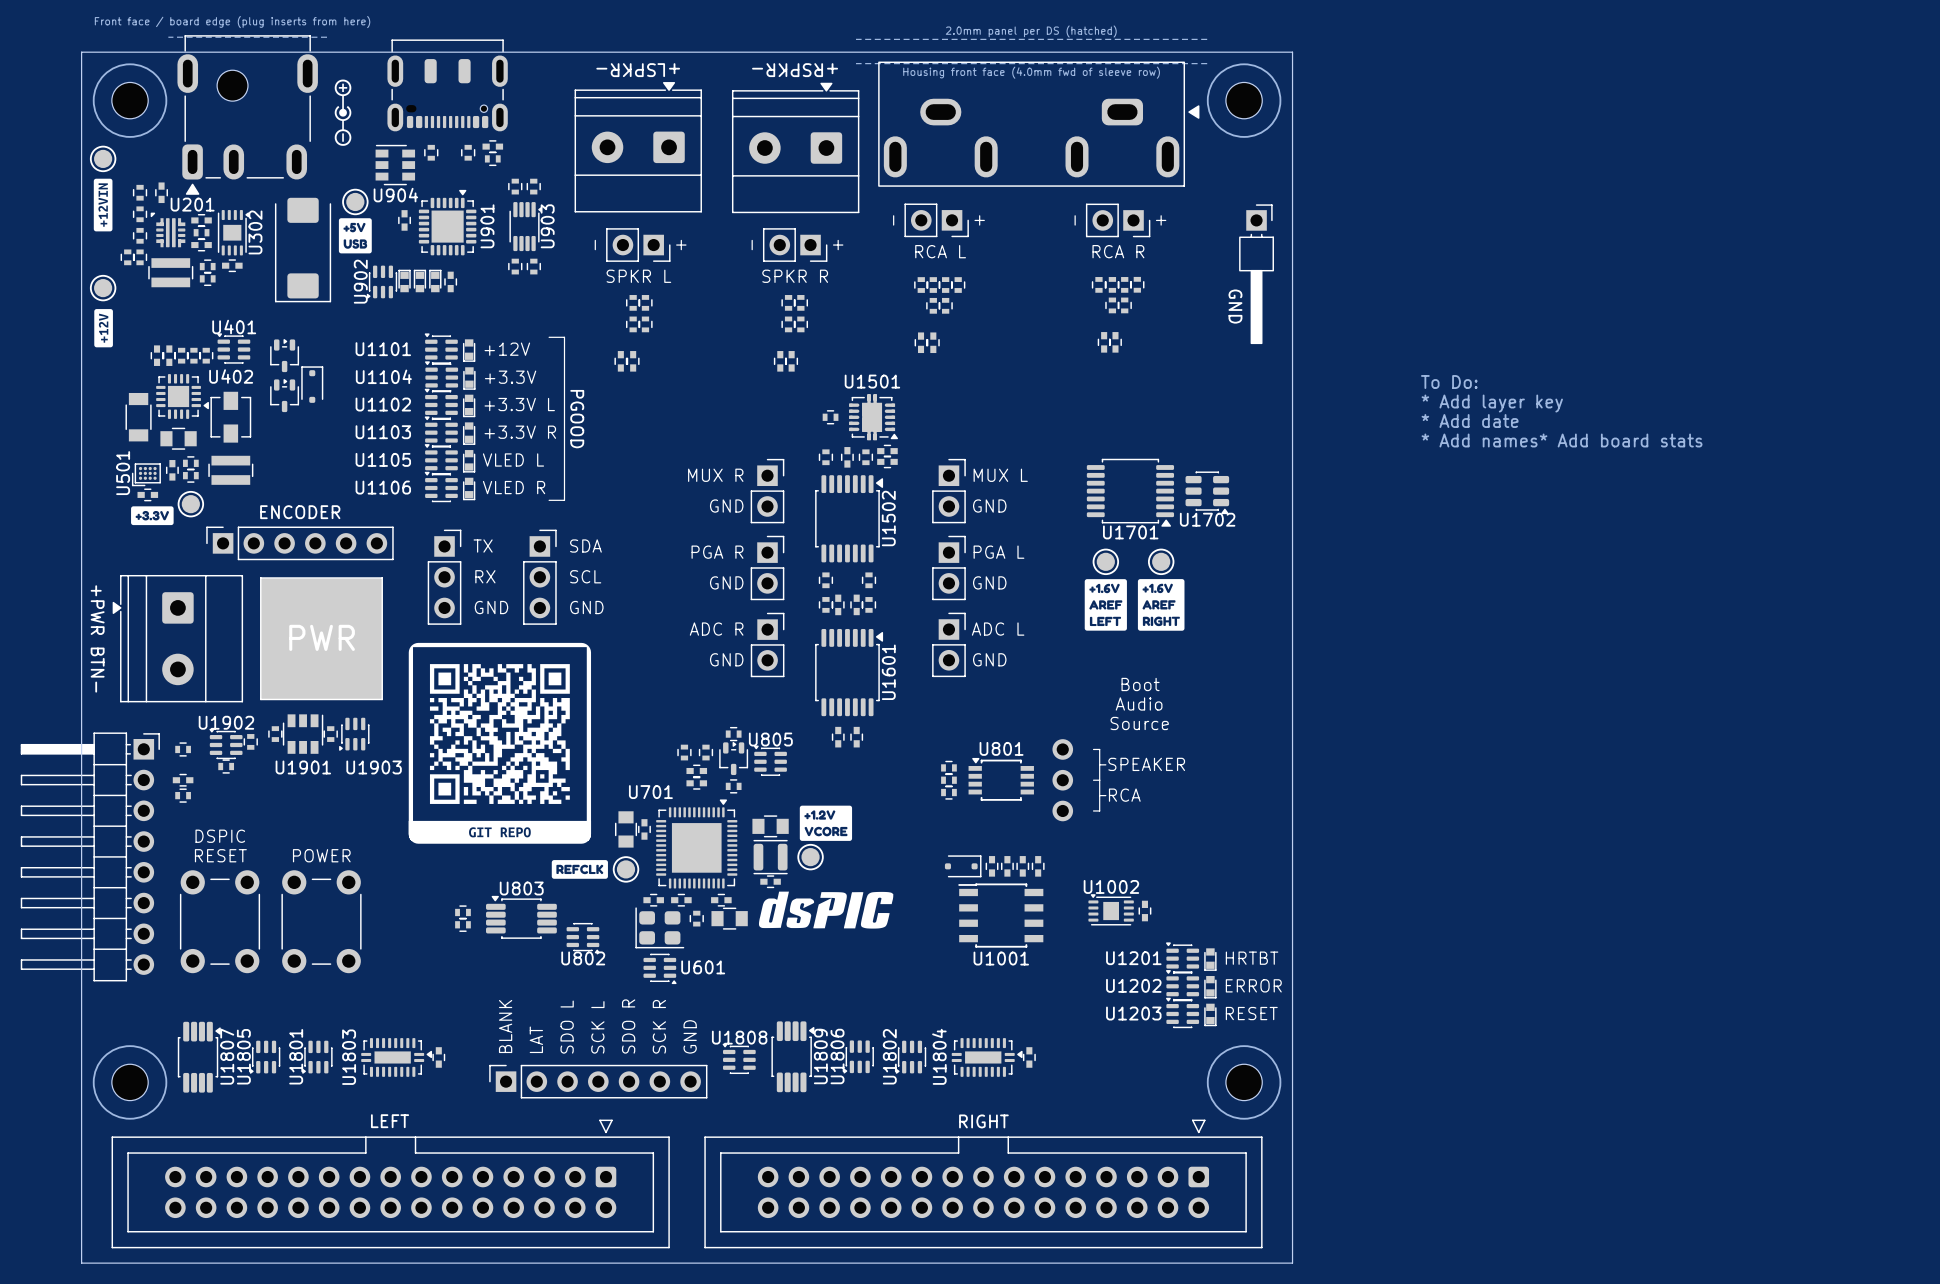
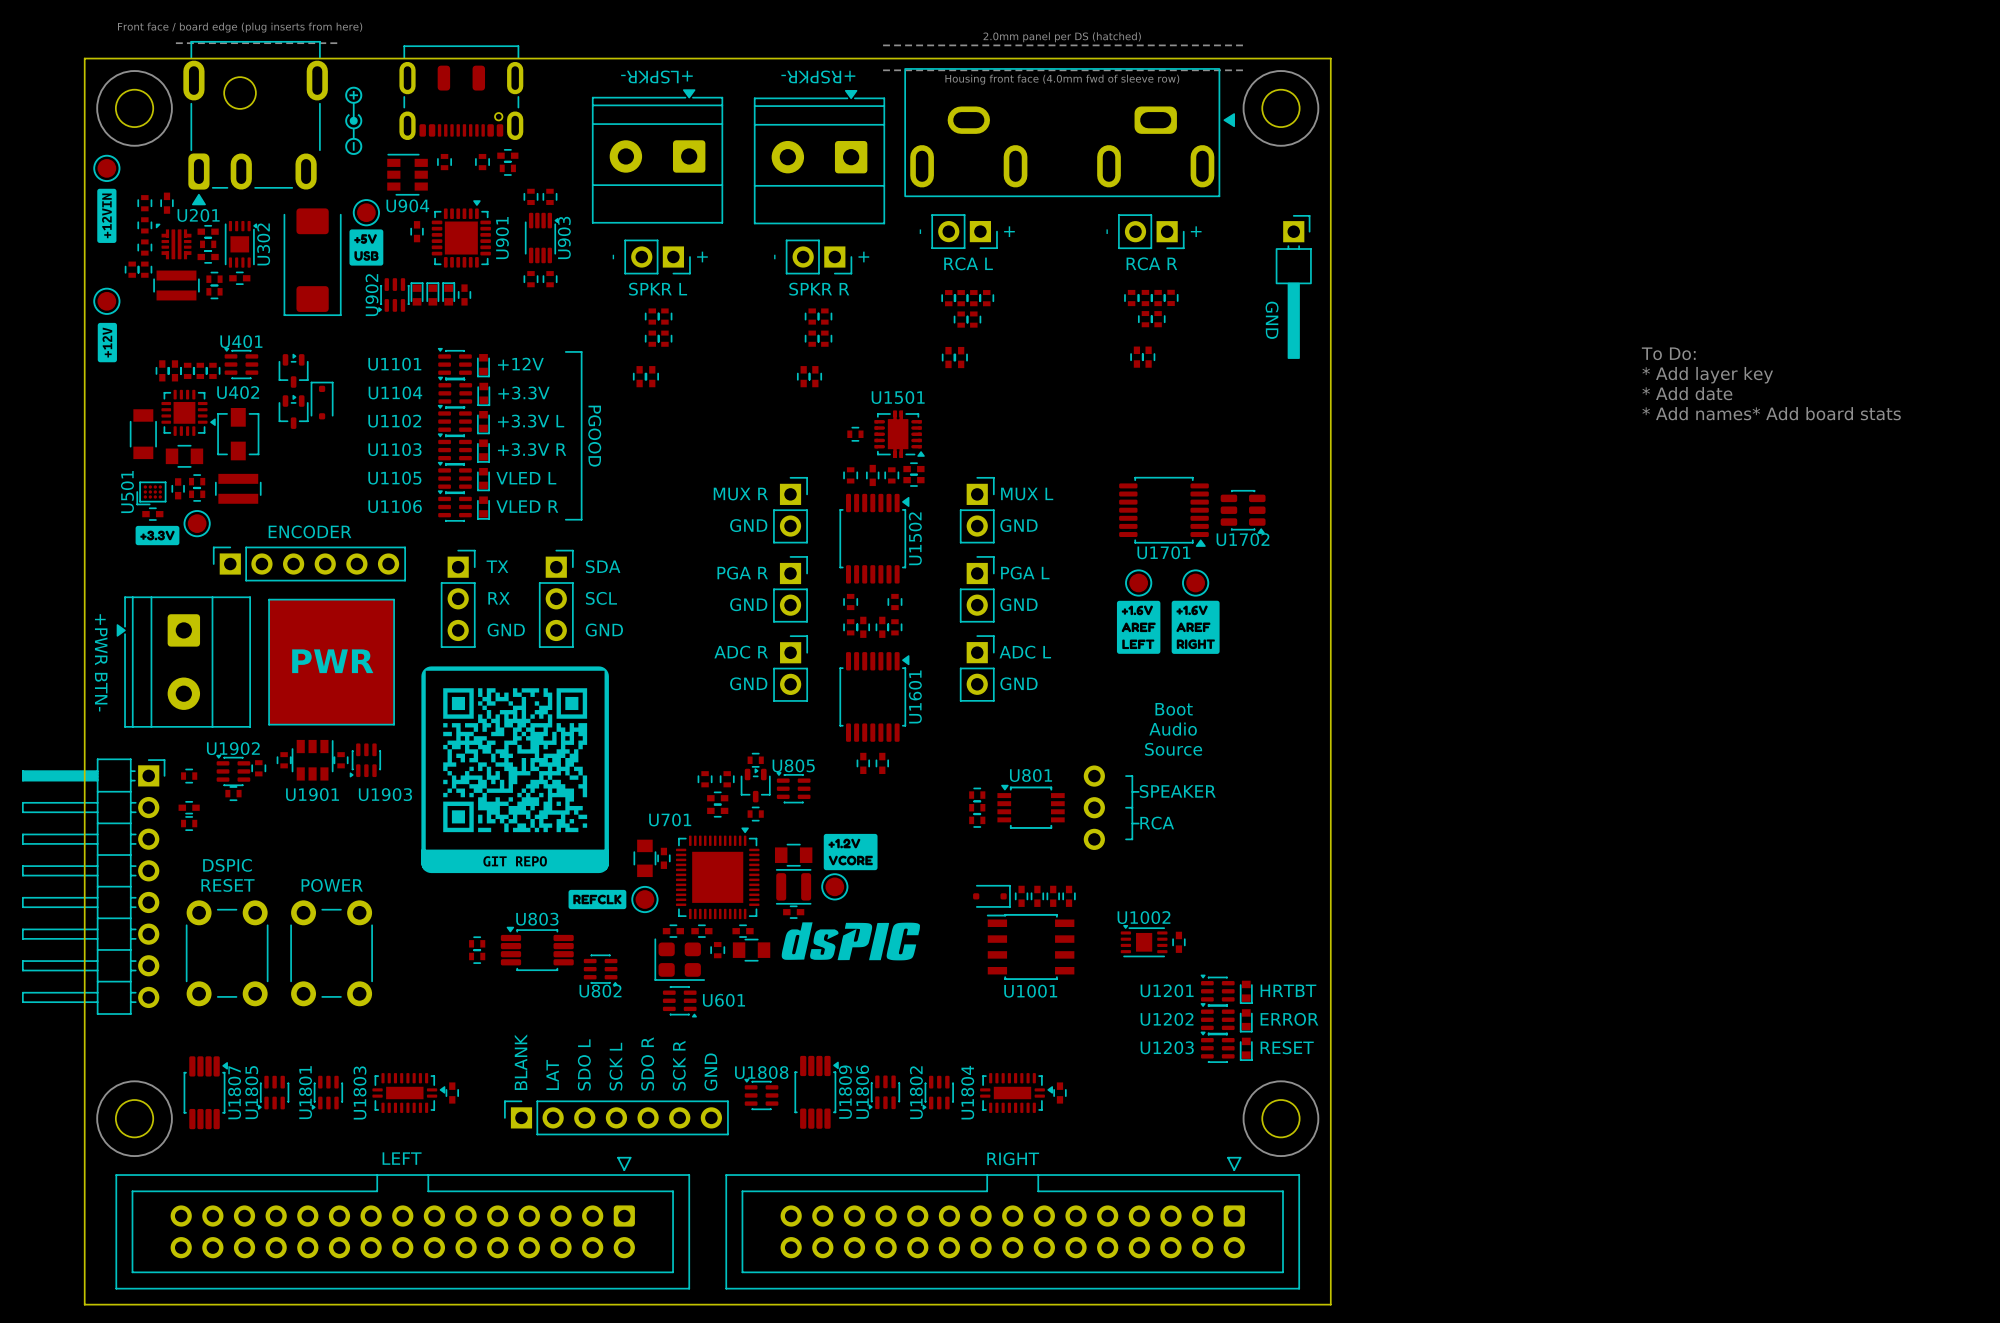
text position: To Do: (1449, 382) -> To Do: (1668, 353)
text position: * Add layer key (1492, 403) -> * Add layer key (1707, 375)
text position: * Add date (1470, 421) -> * Add date (1687, 393)
text position: * Add names* Add board stats (1562, 440) -> * Add names* Add board stats (1771, 413)

